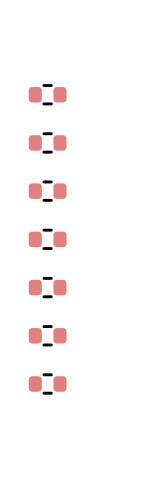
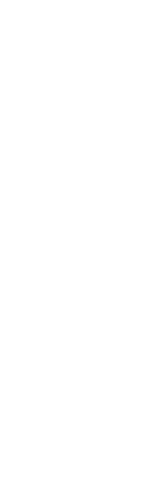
part: (47, 94) -> none
part: (47, 142) -> none
part: (47, 191) -> none
part: (47, 239) -> none
part: (47, 287) -> none
part: (47, 335) -> none
part: (47, 383) -> none

